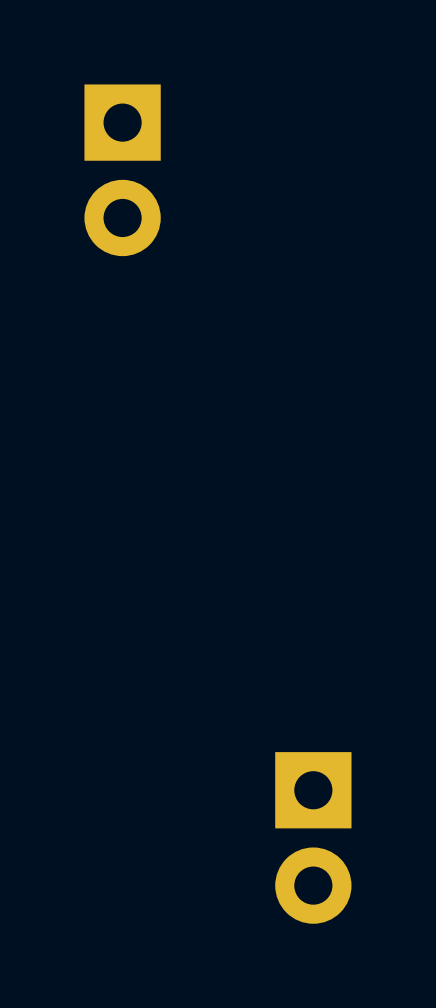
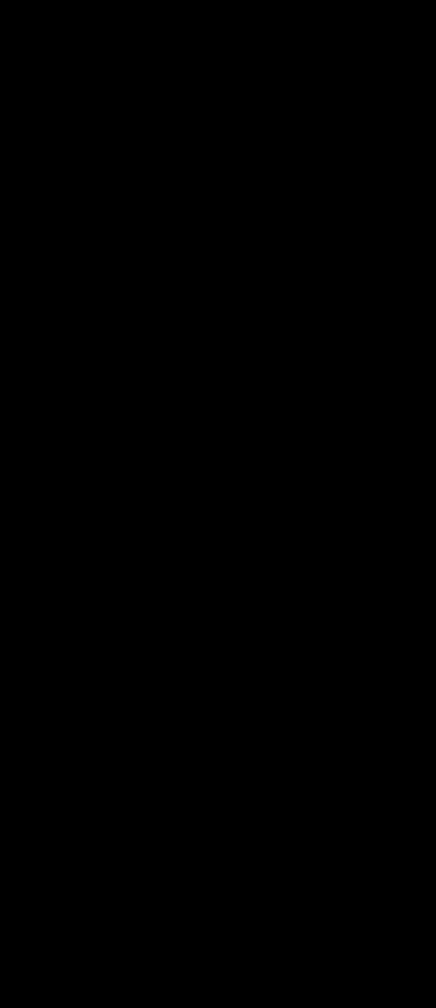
part: (122, 170) -> none
part: (313, 837) -> none

